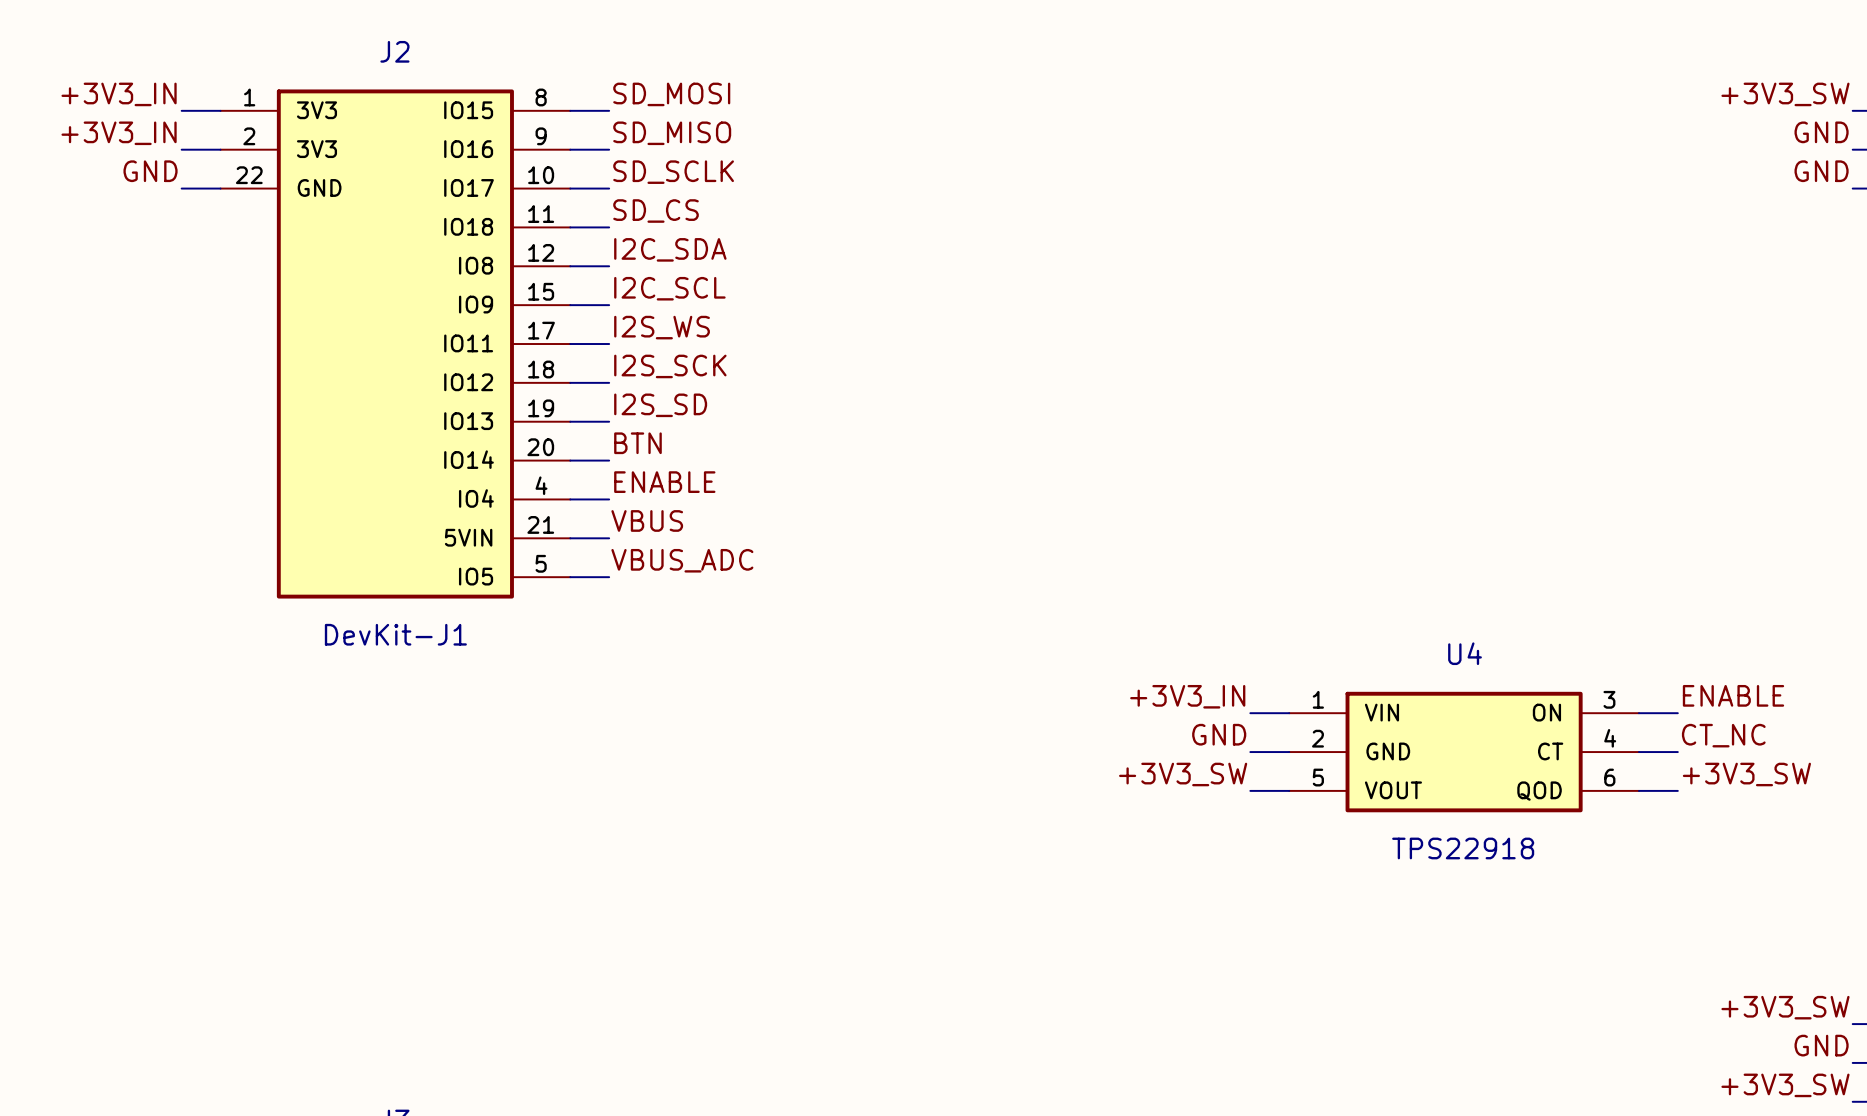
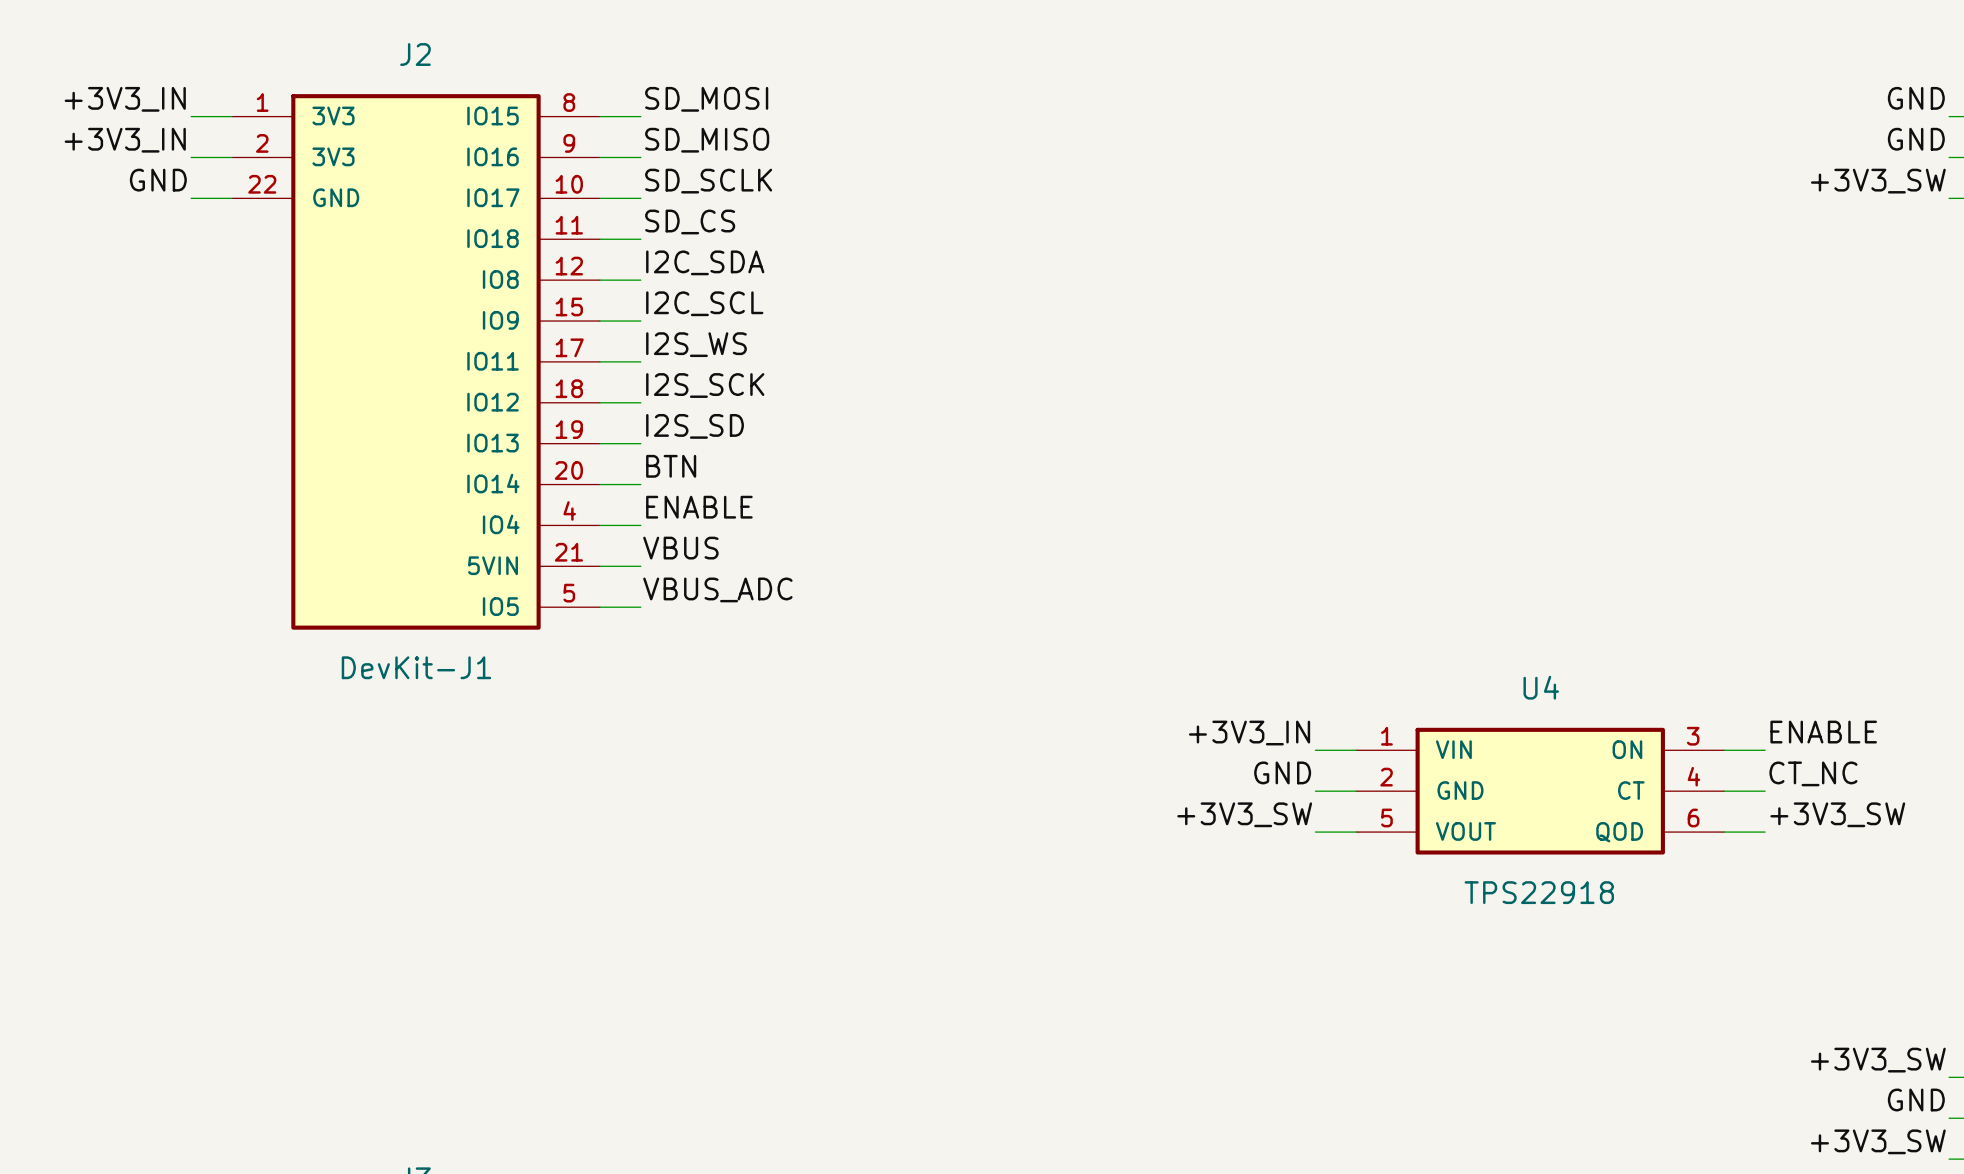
label: +3V3_SW (1785, 94) -> GND (1916, 98)
label: GND (1821, 171) -> +3V3_SW (1878, 181)

